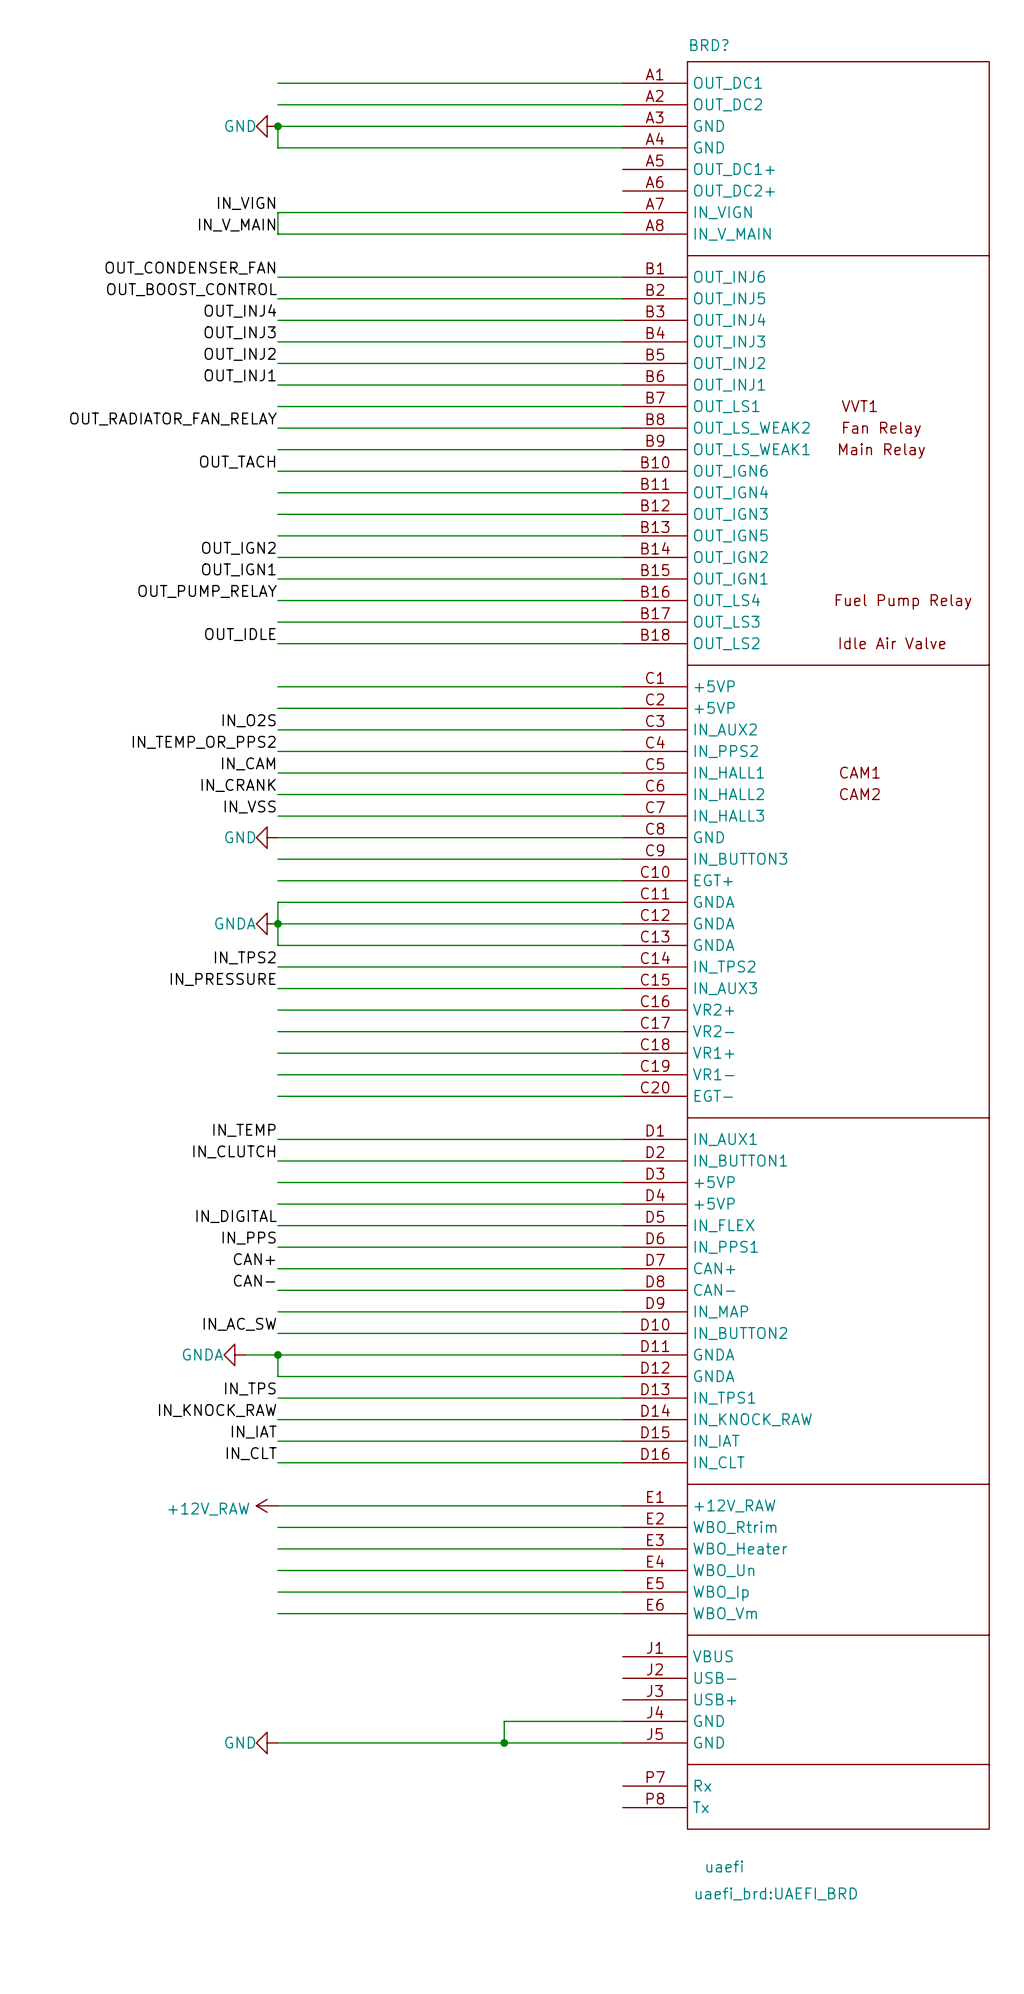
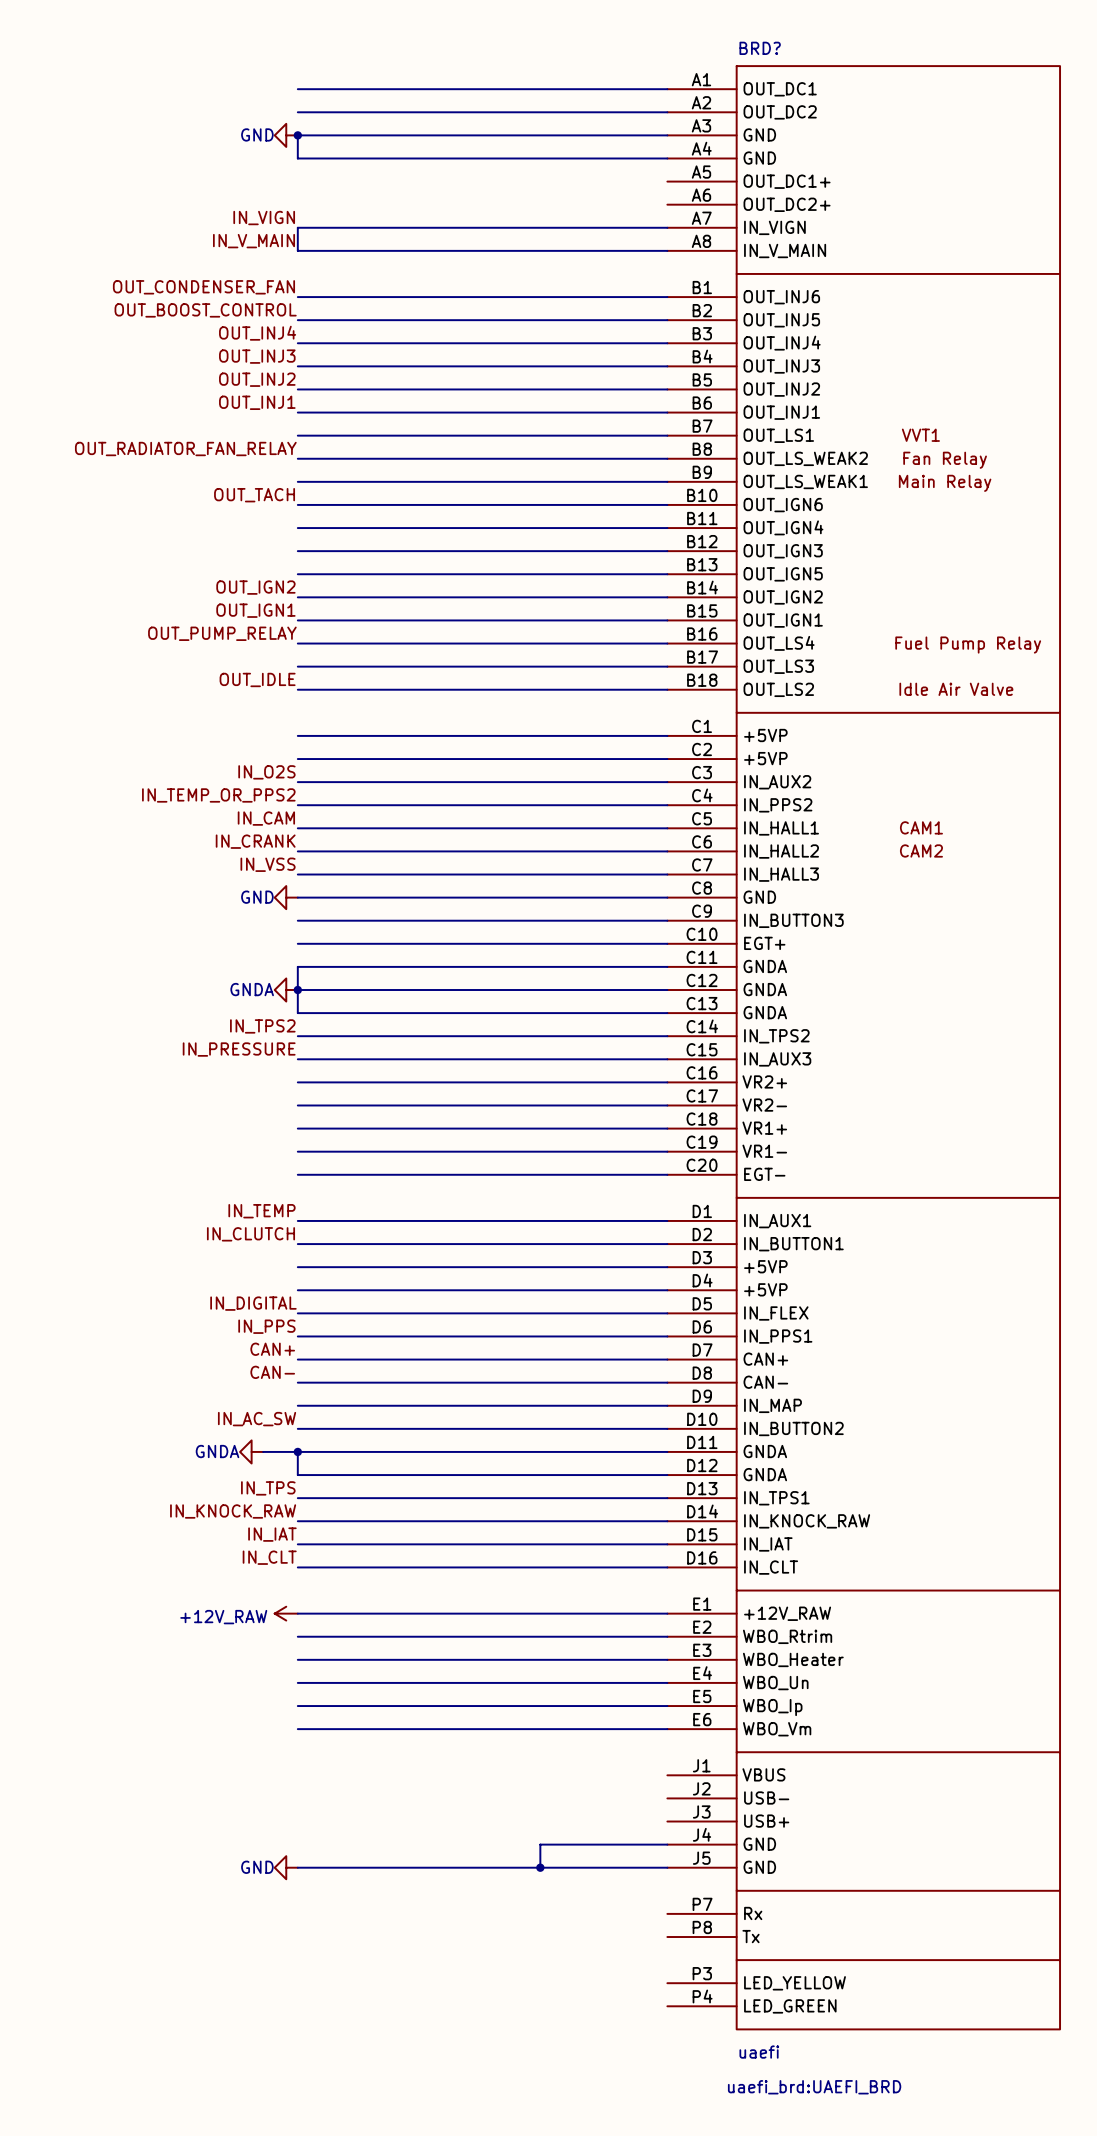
BRD?: uaefi (806, 945) -> none
BRD?: none -> uaefi (863, 1047)

